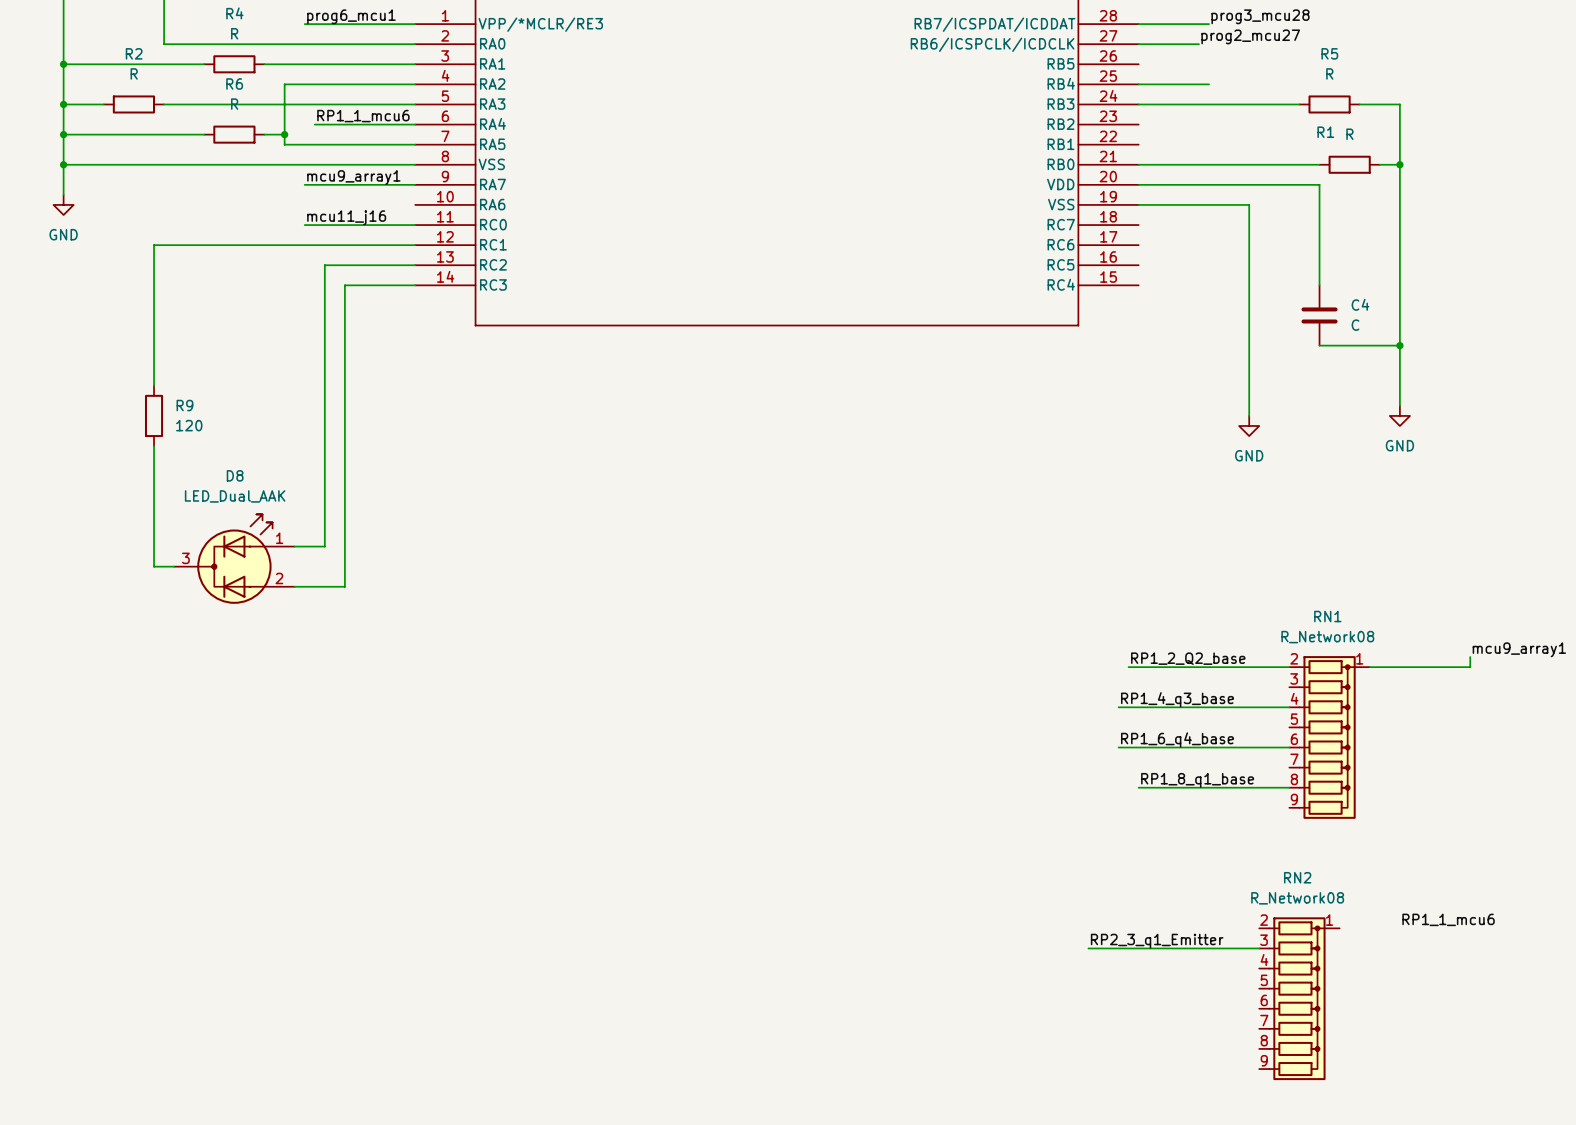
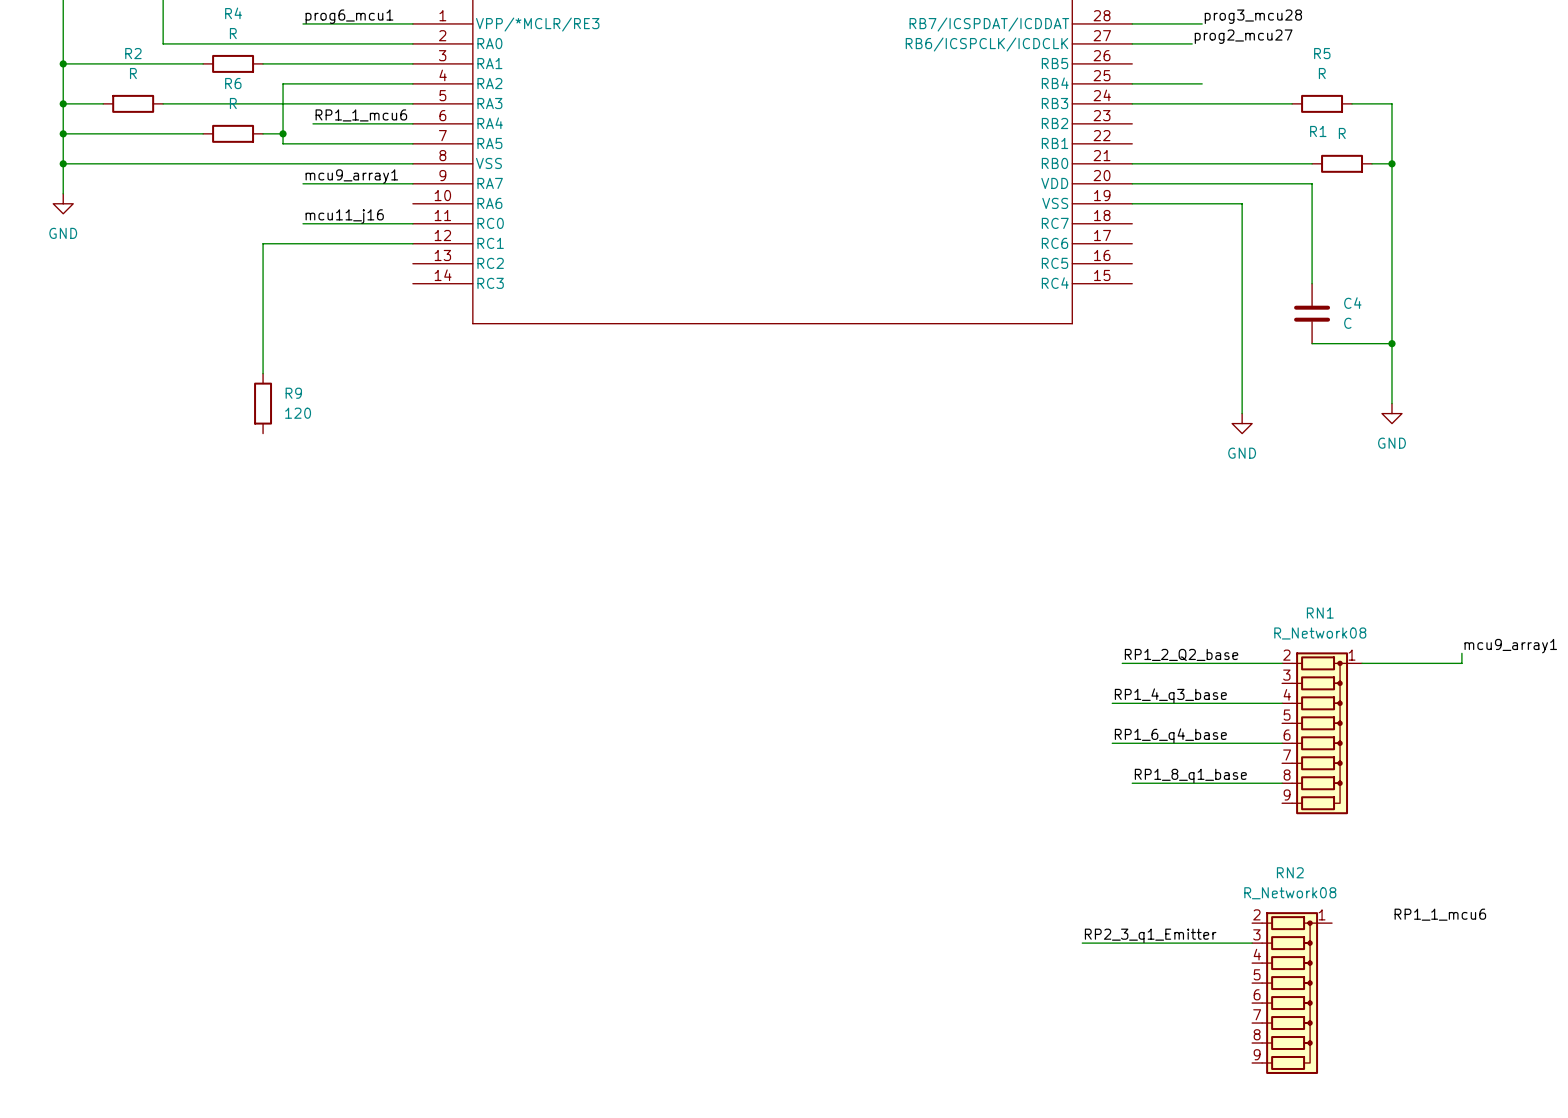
wire: (264, 245) (154, 245) (154, 385) -> (263, 243) (263, 373)
wire: (415, 265) (324, 265) (324, 546) (294, 546) -> none
wire: (415, 285) (344, 285) (344, 586) (294, 586) -> none
R9 position: (154, 415) -> (263, 403)
wire: (154, 446) (154, 566) (174, 566) -> none
D8: LED_Dual_AAK (234, 559) -> none

